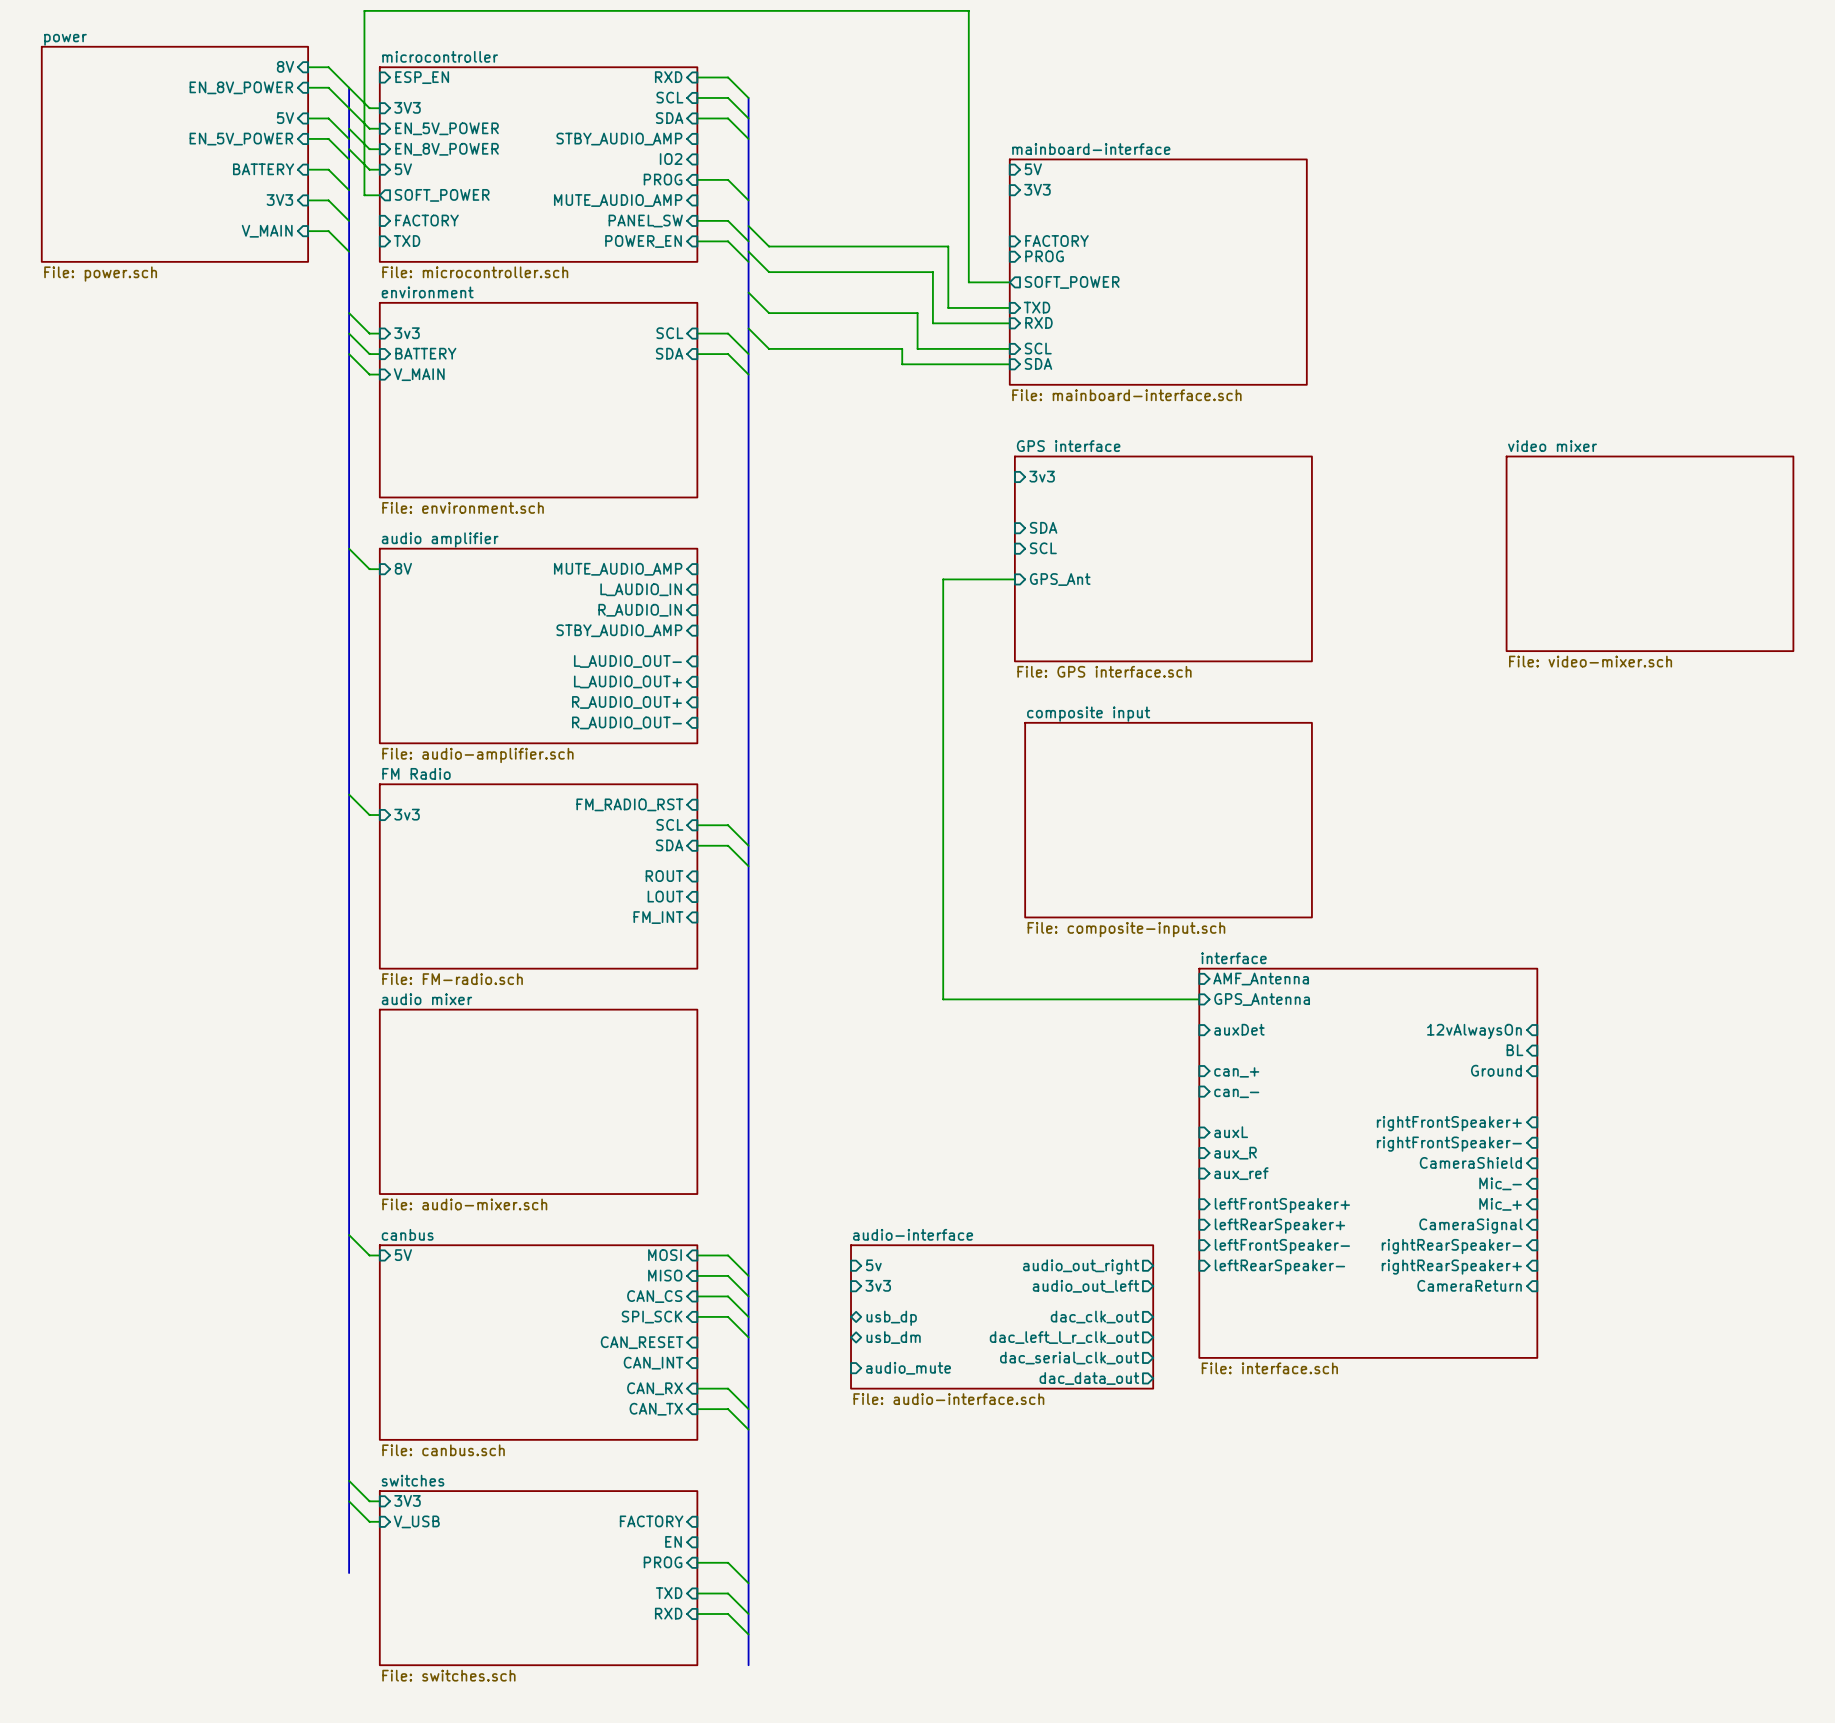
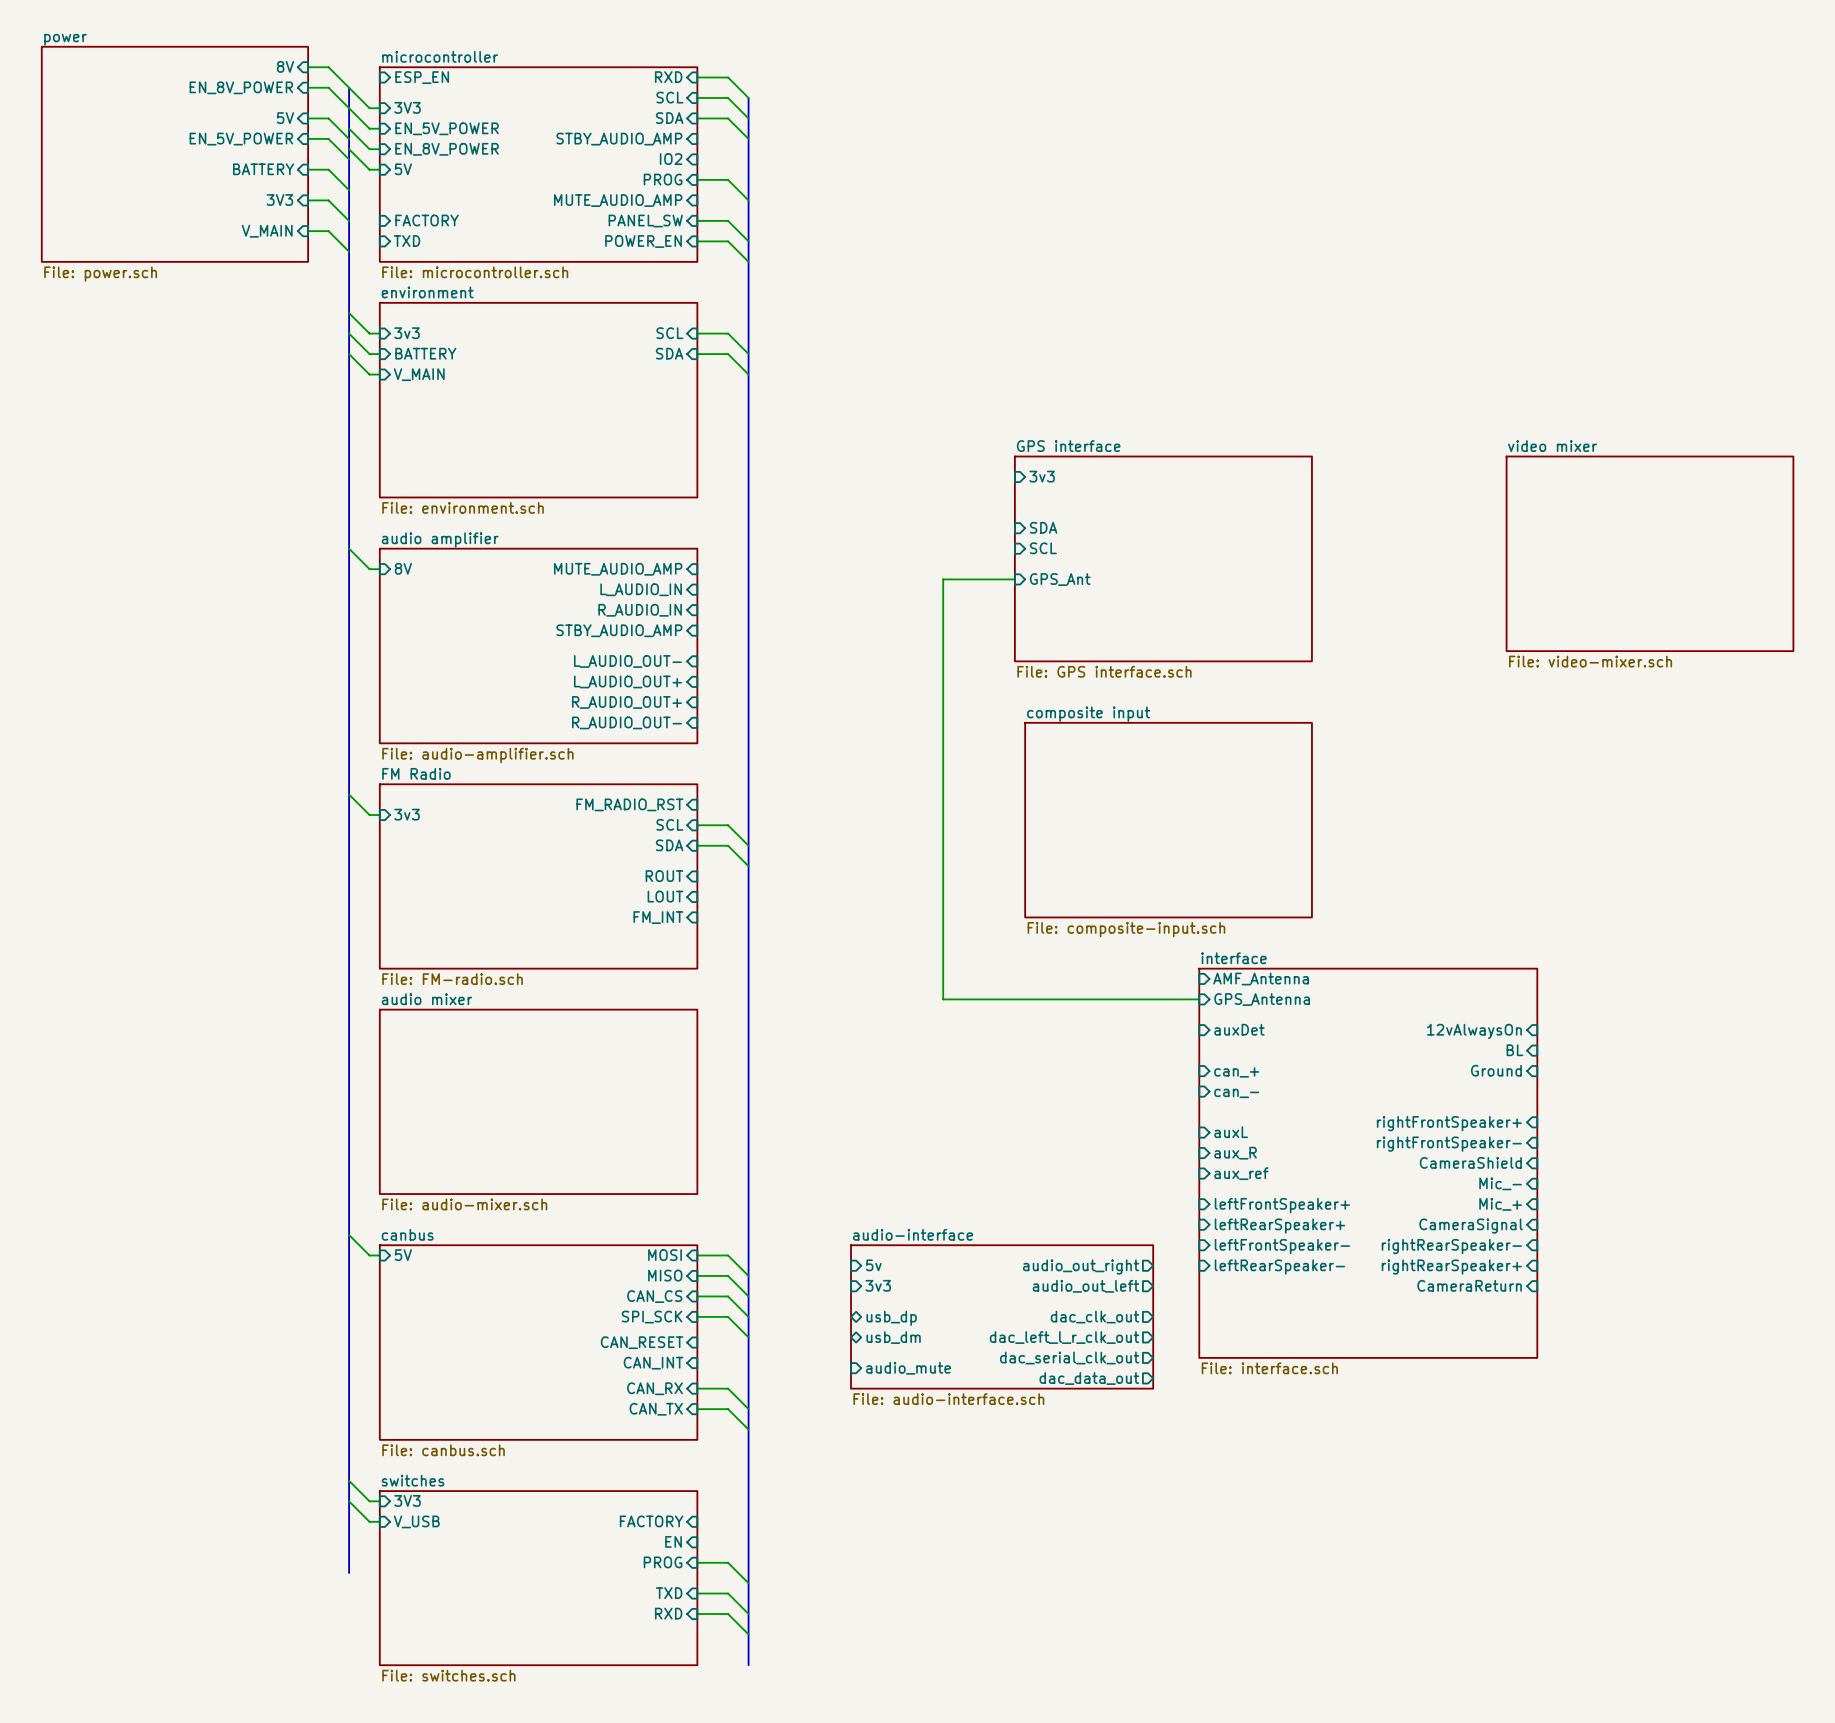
sheet pin: 5V (1033, 169) -> none
sheet pin: 3V3 (1037, 189) -> none
wire: (379, 195) (364, 195) (364, 10) (968, 10) (968, 282) (1009, 282) -> none
sheet pin: SOFT_POWER (442, 195) -> none
wire: (748, 226) (769, 246) (948, 246) (948, 307) (1009, 307) -> none
sheet pin: FACTORY (1057, 241) -> none
wire: (748, 251) (769, 272) (932, 272) (932, 323) (1009, 323) -> none
sheet pin: PROG (1044, 256) -> none
sheet mainboard-interface: File: mainboard-interface.sch (1158, 272) -> none
sheet pin: SOFT_POWER (1072, 282) -> none
wire: (748, 292) (769, 313) (917, 313) (917, 348) (1009, 348) -> none
sheet pin: TXD (1037, 307) -> none
sheet pin: RXD (1038, 322) -> none
wire: (748, 328) (769, 348) (902, 348) (902, 364) (1009, 364) -> none
sheet pin: SCL (1038, 348) -> none
sheet pin: SDA (1038, 363) -> none

